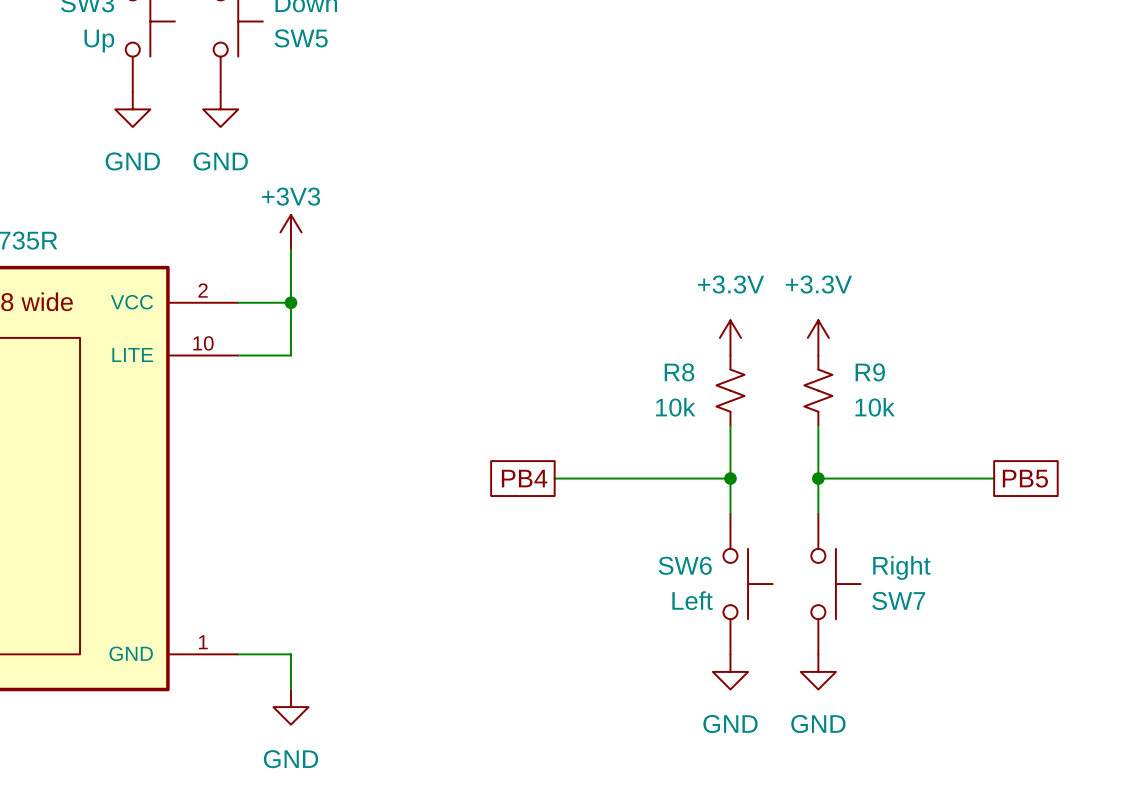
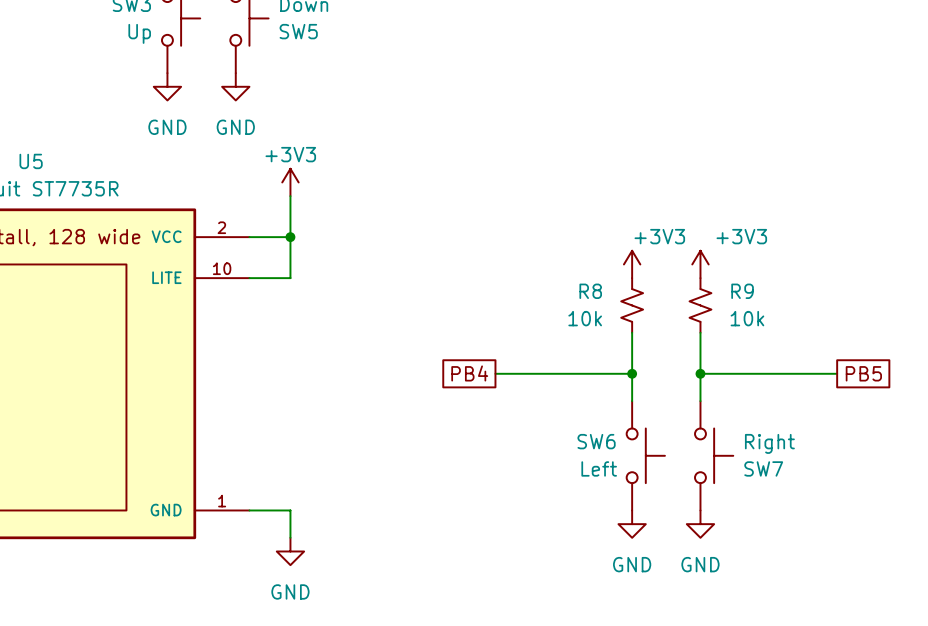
power symbol: +3.3V (730, 337) -> +3V3 (632, 264)
power symbol: +3.3V (818, 337) -> +3V3 (700, 264)

